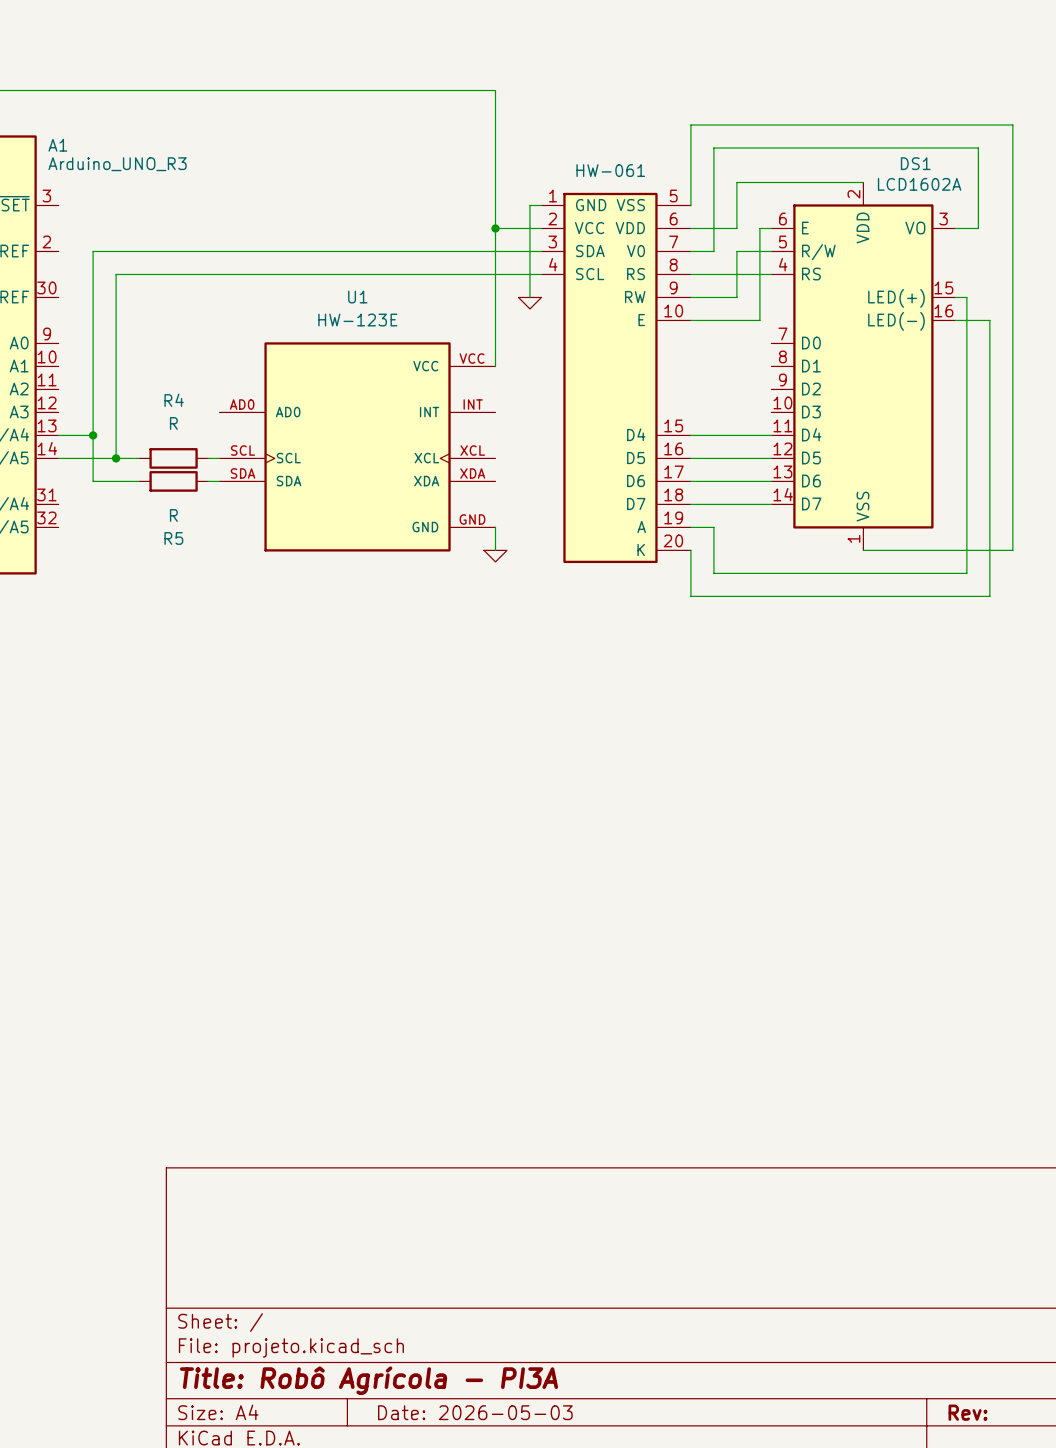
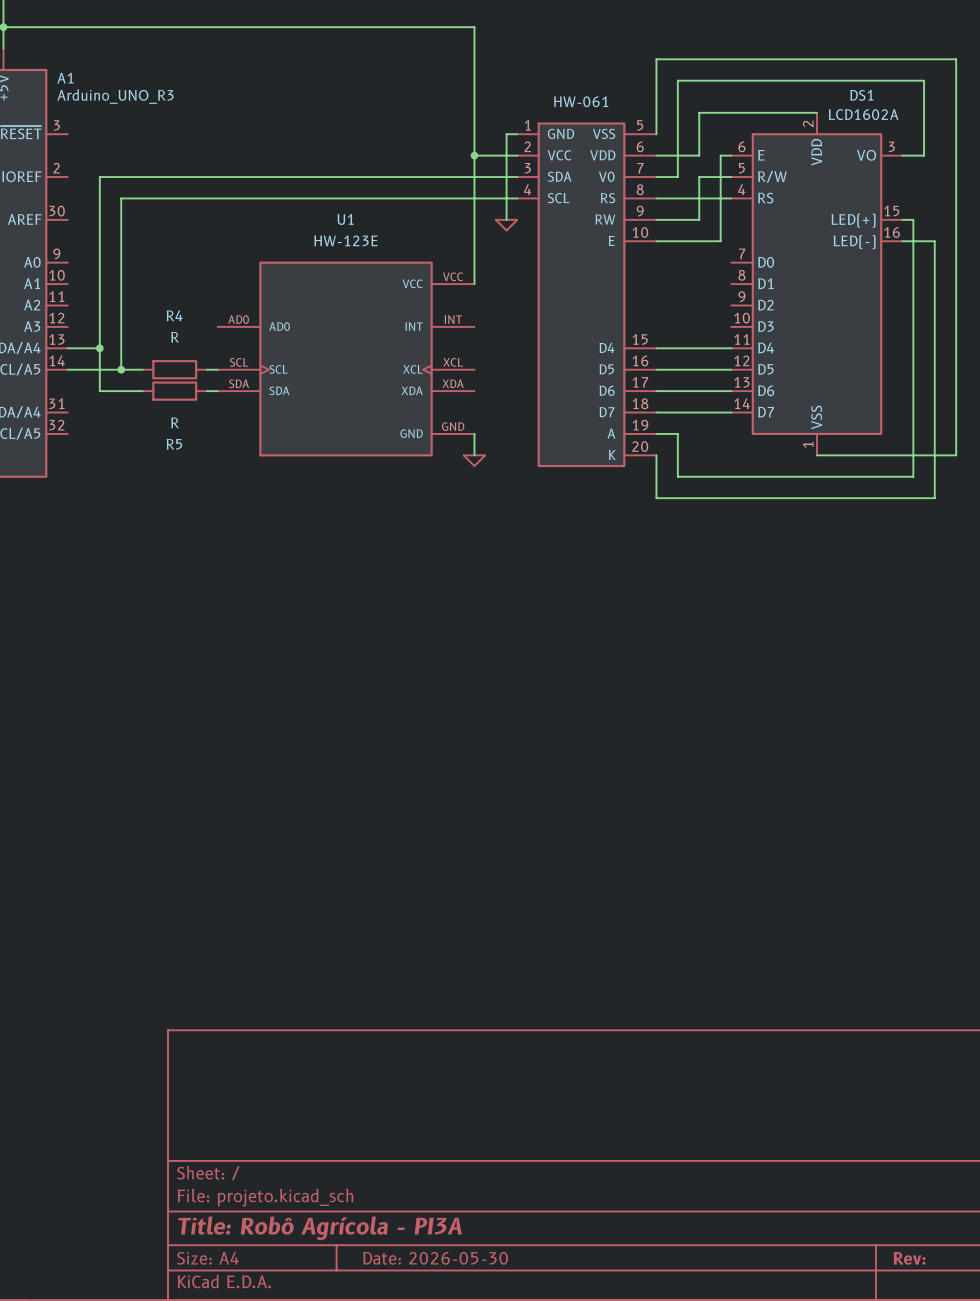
title block: Date: 2026-05-03 (475, 1412) -> Date: 2026-05-30 (435, 1258)

